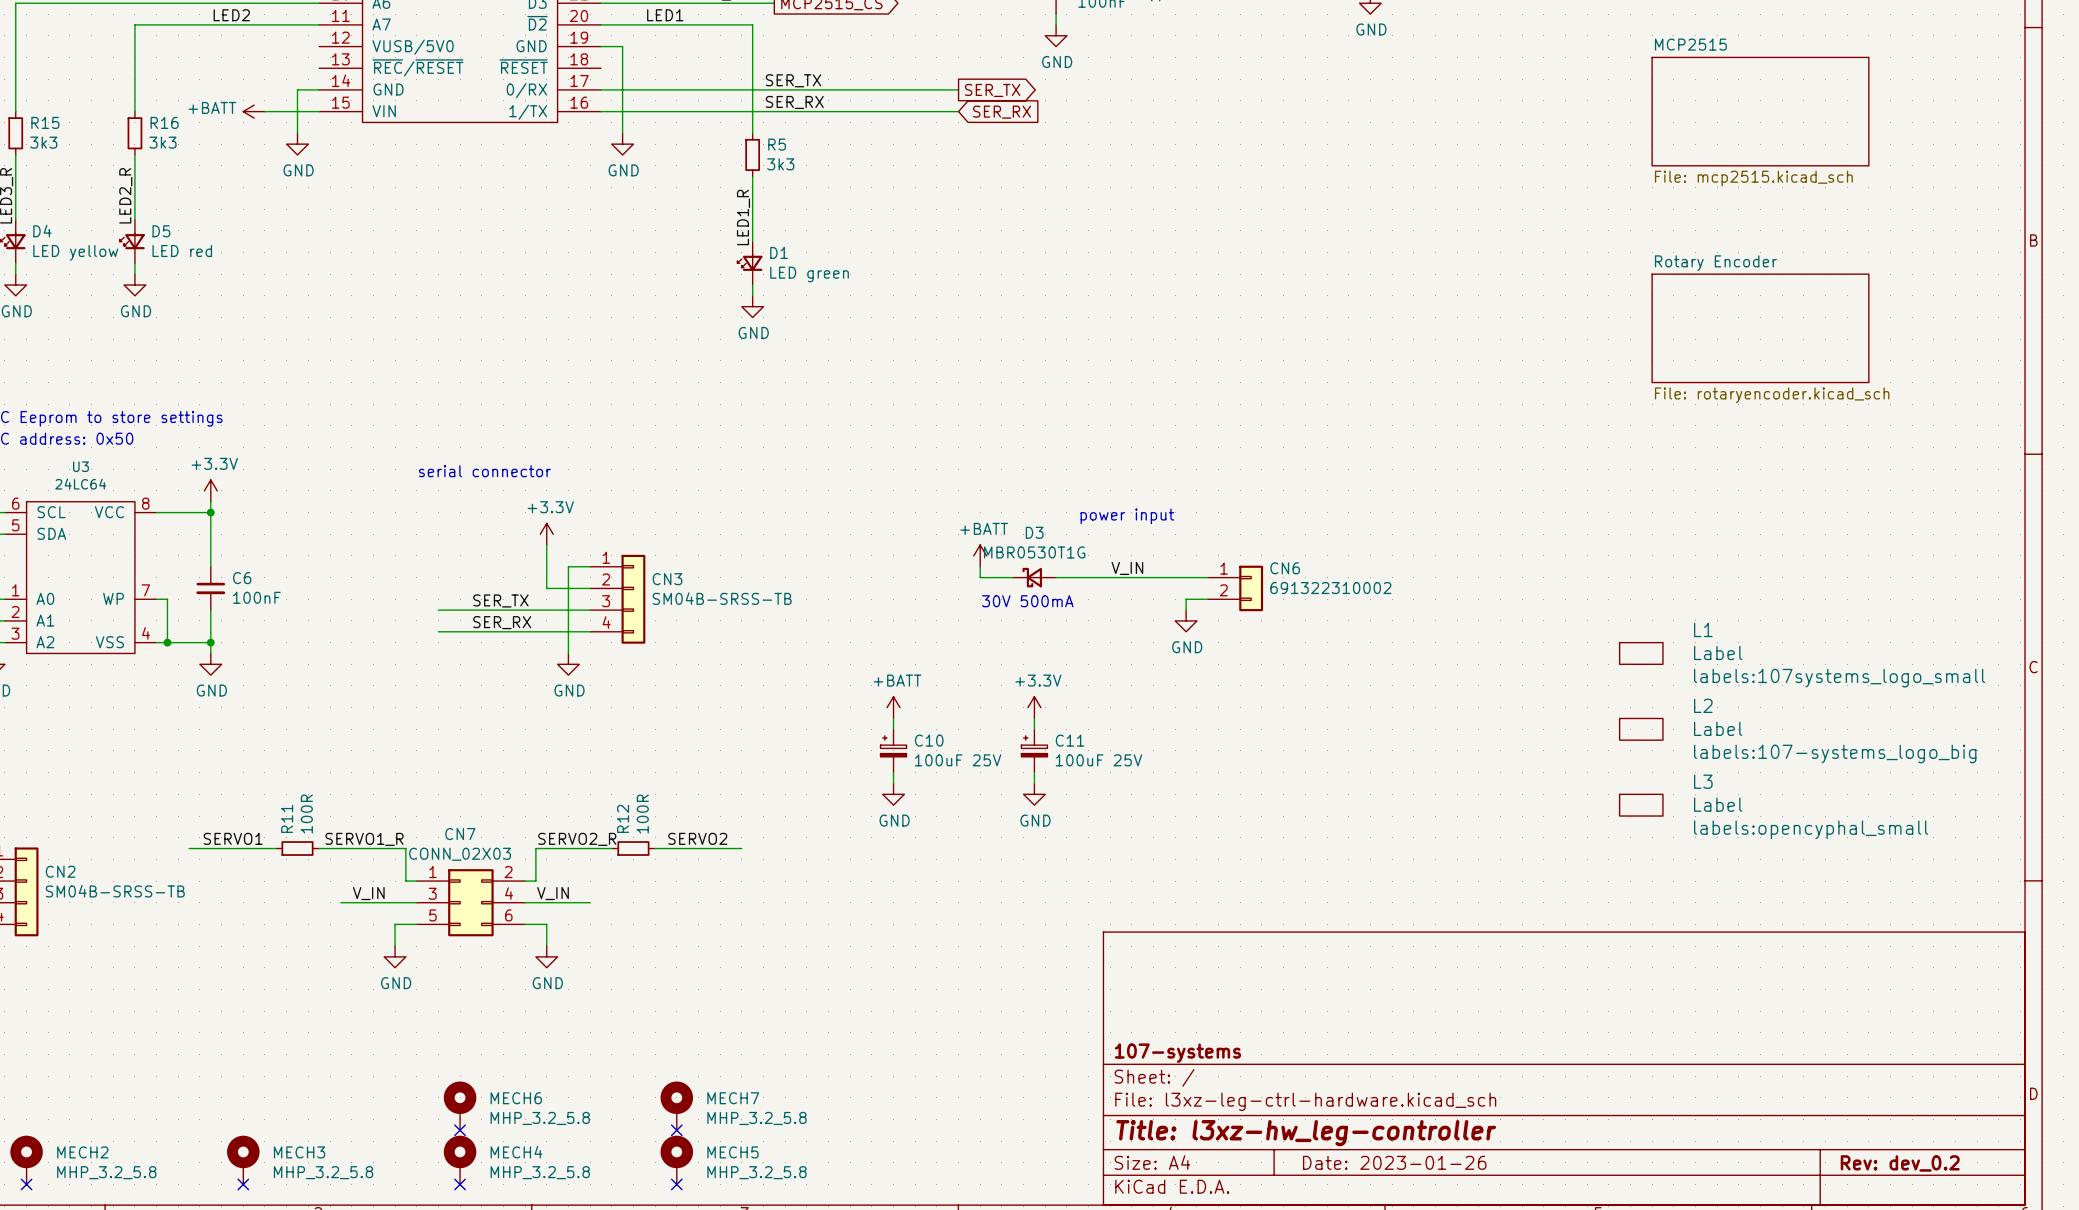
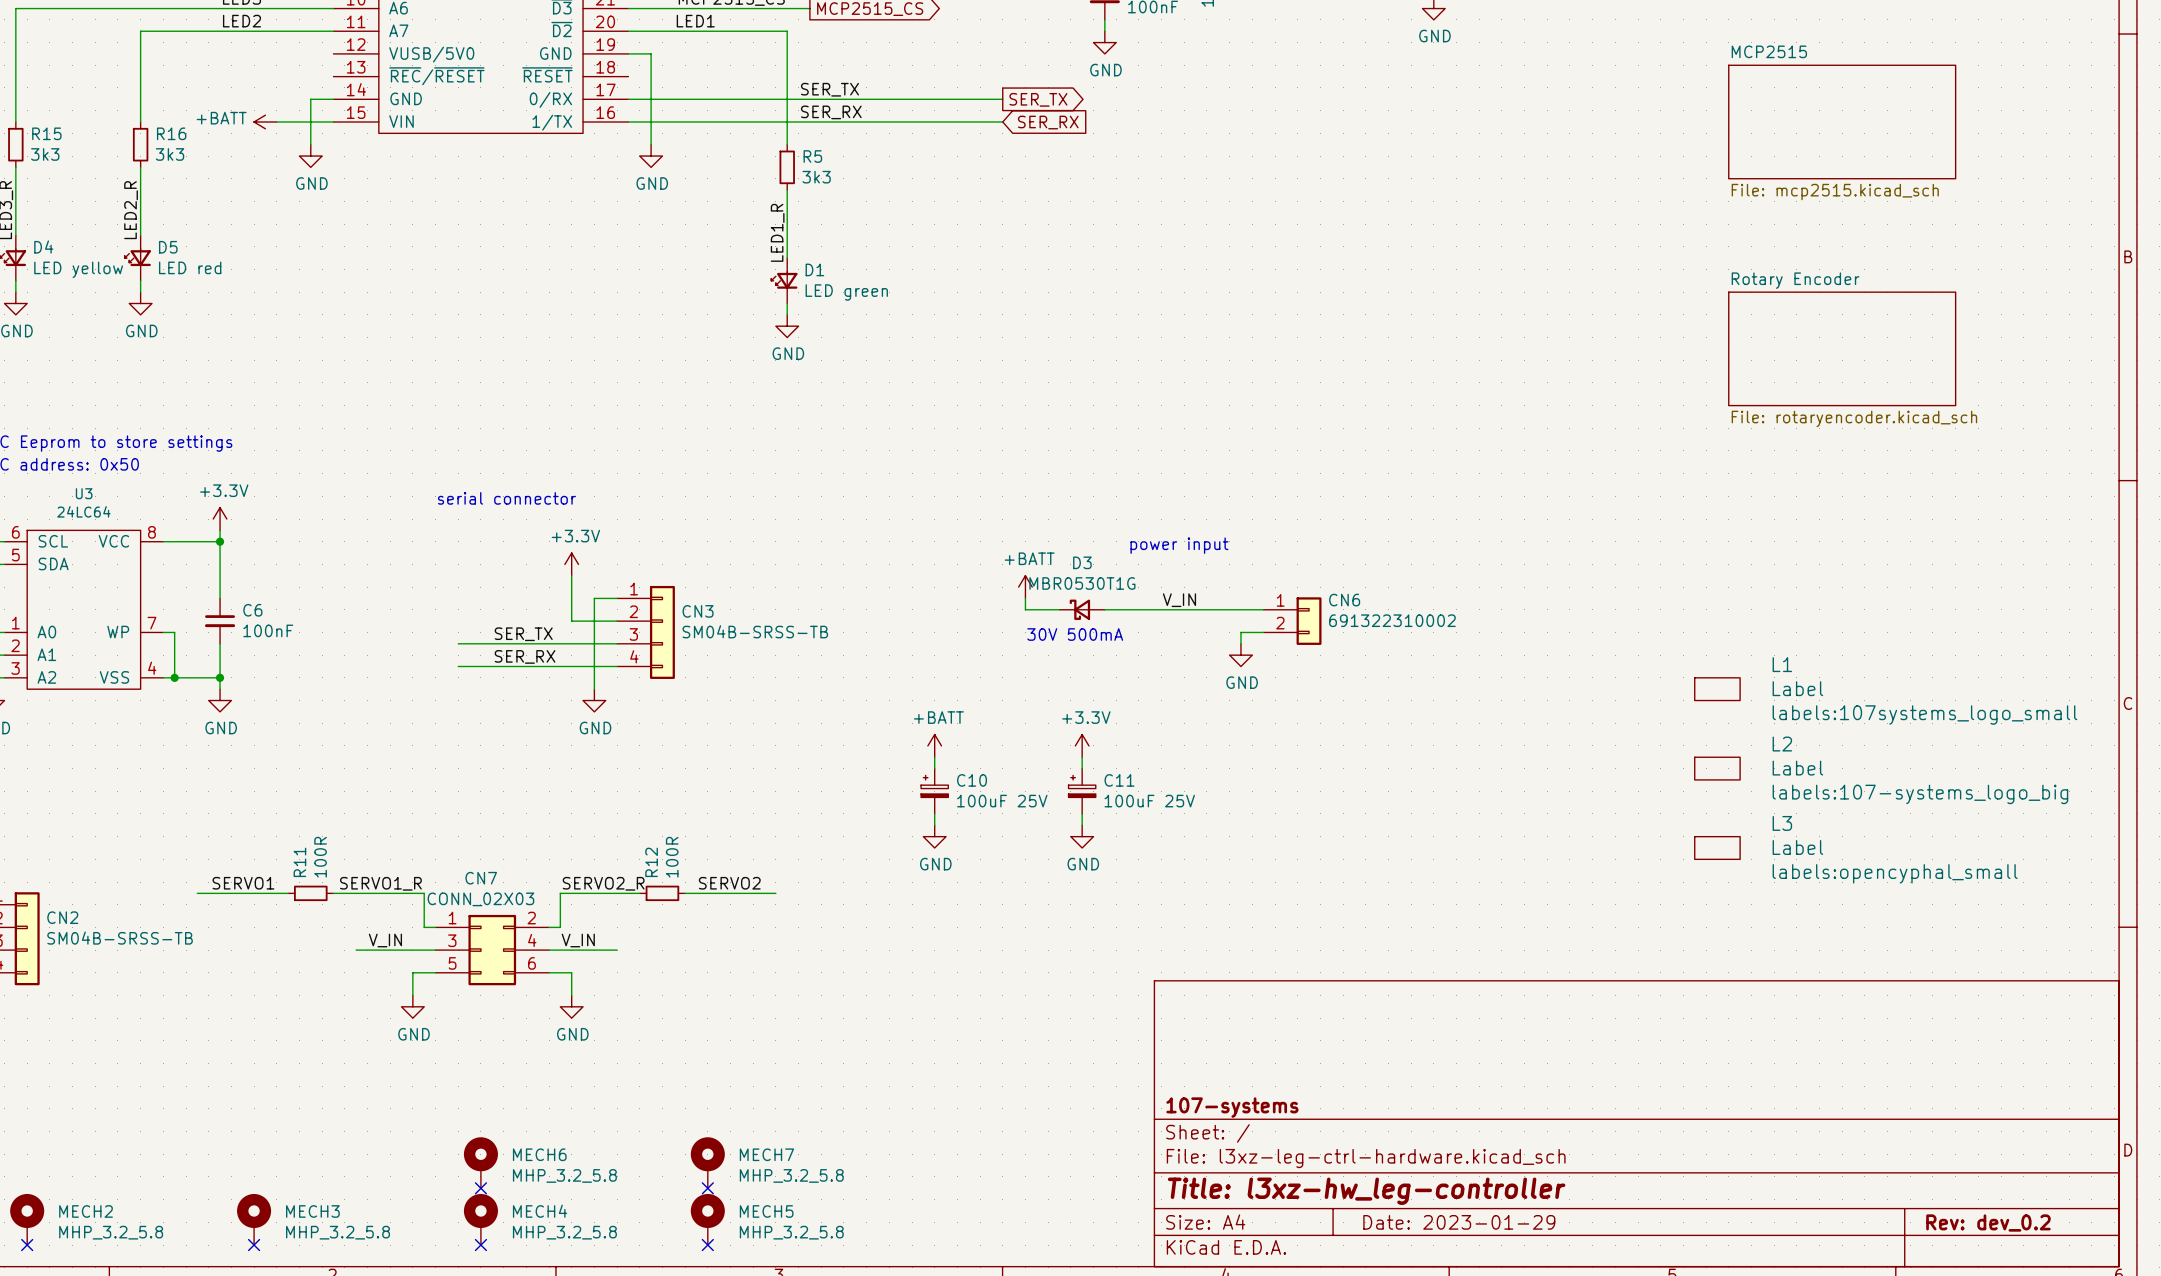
title block: Date: 2023-01-26 (1394, 1162) -> Date: 2023-01-29 (1459, 1222)

